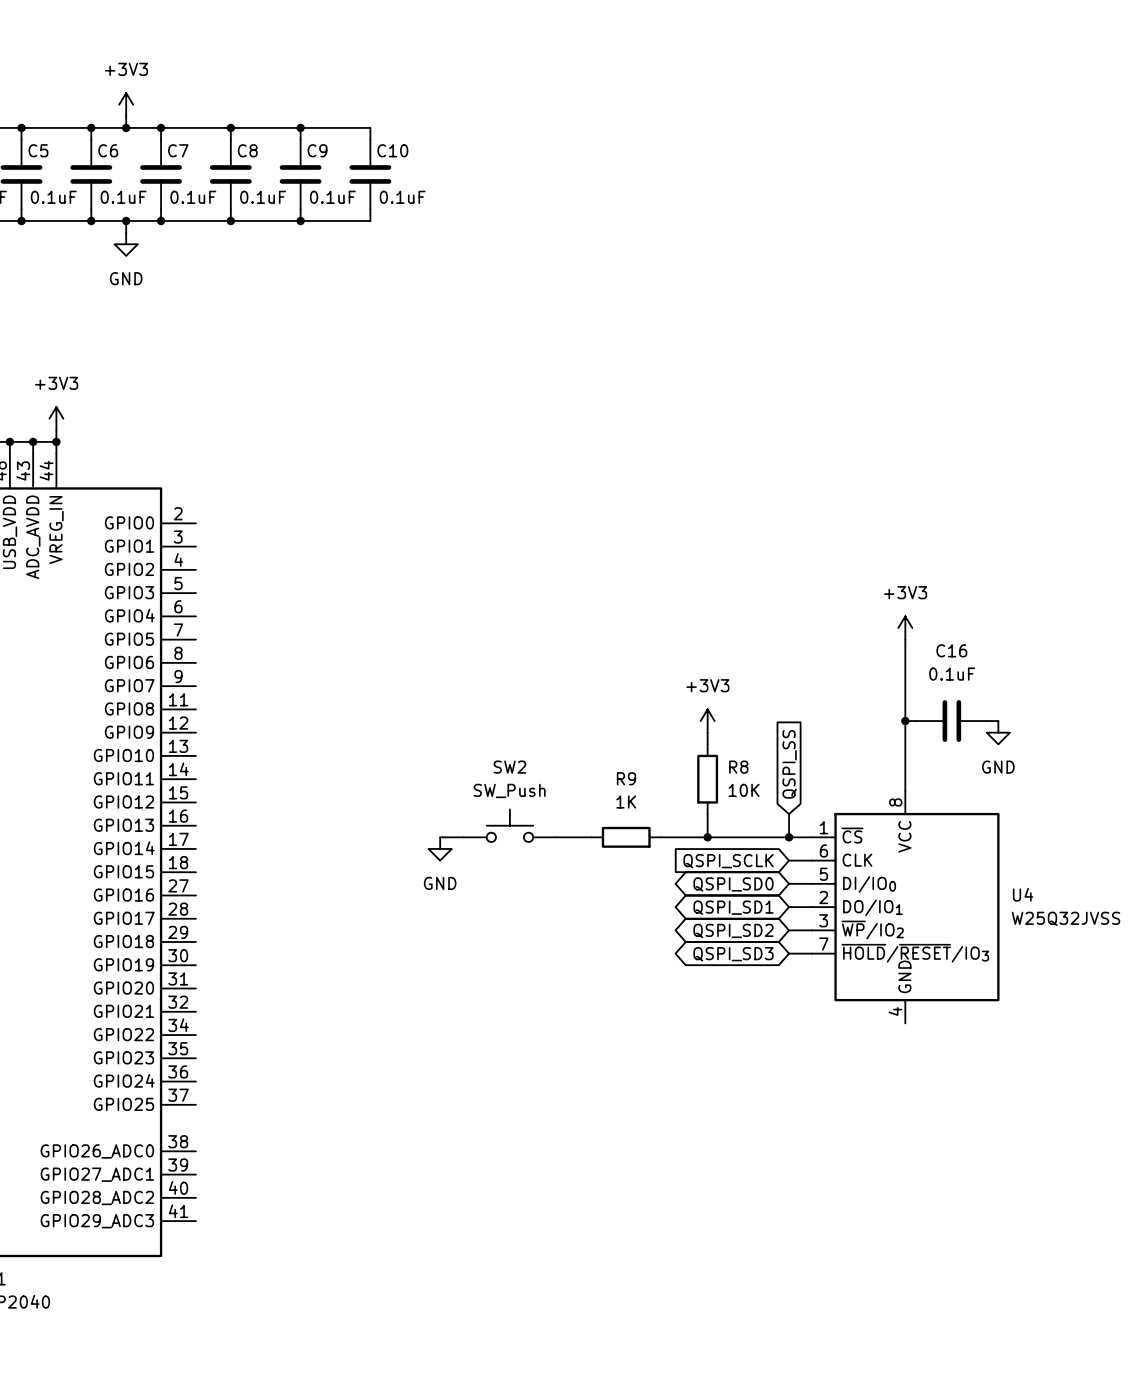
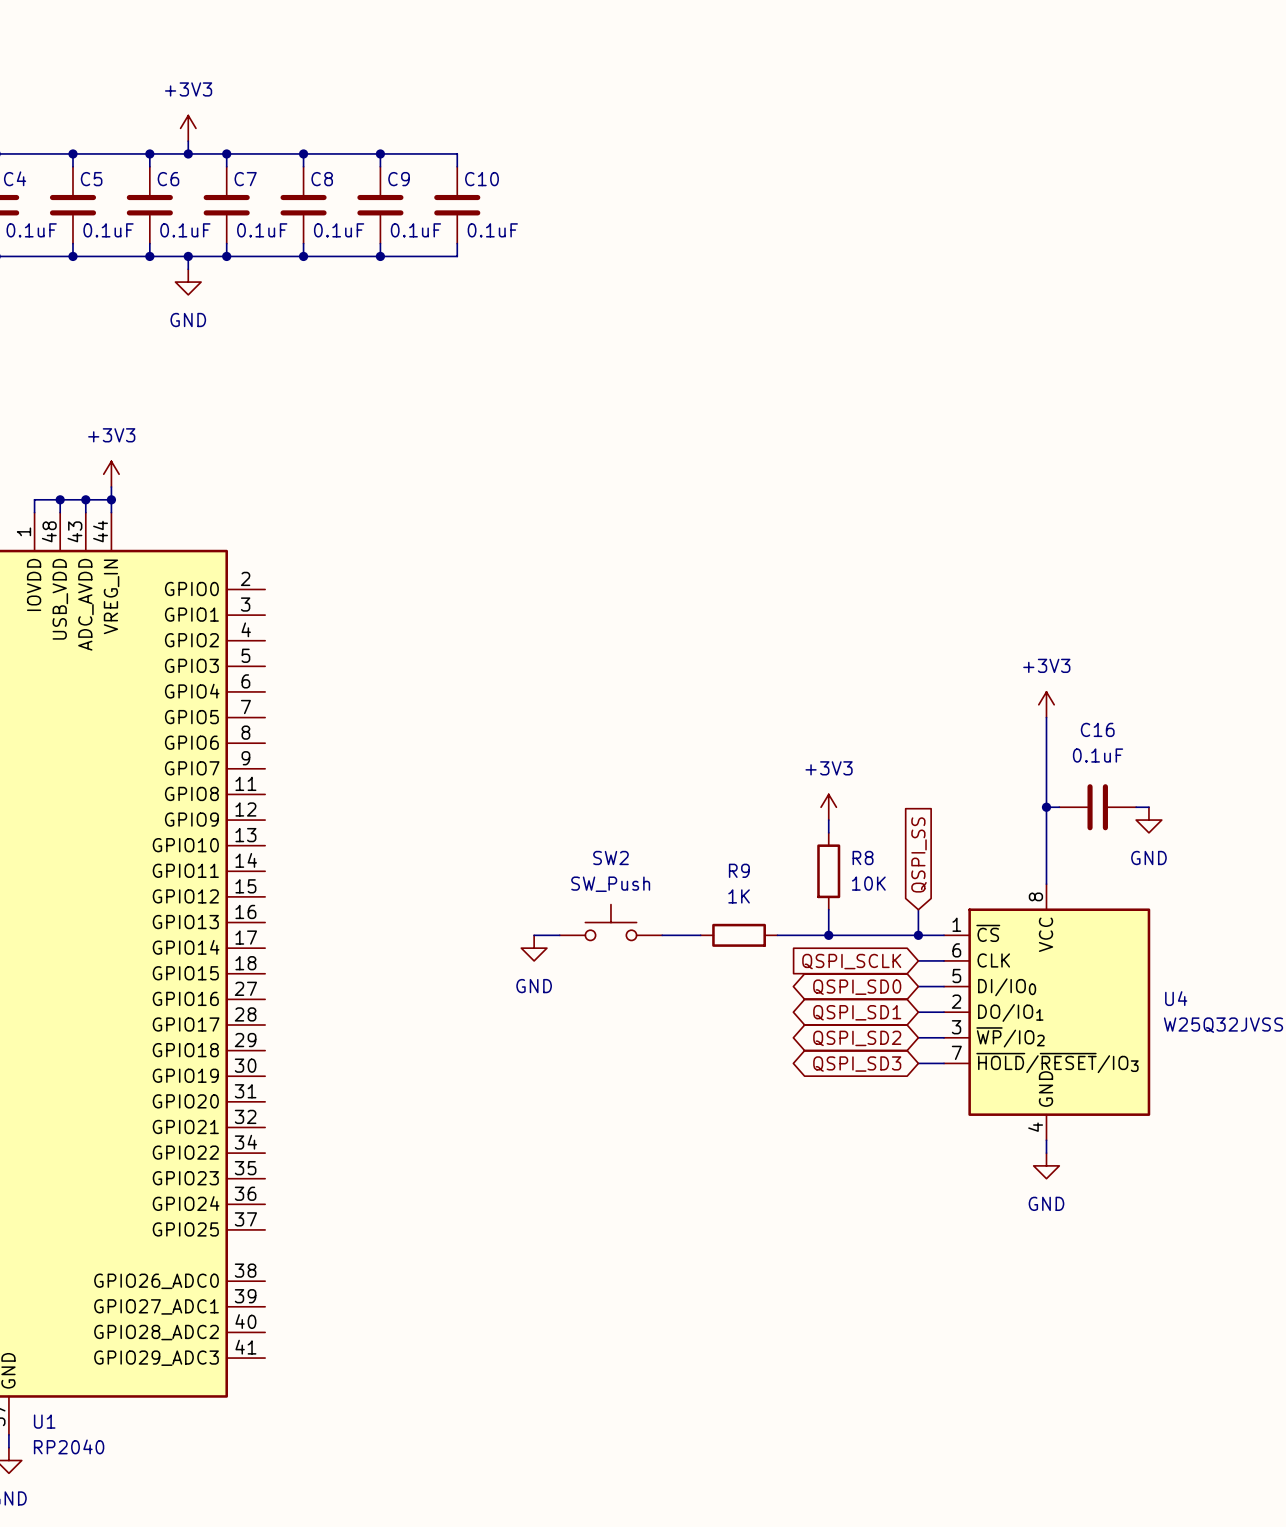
wire: none -> (1046, 1140) (1046, 1153)
power symbol: none -> GND (1046, 1165)

